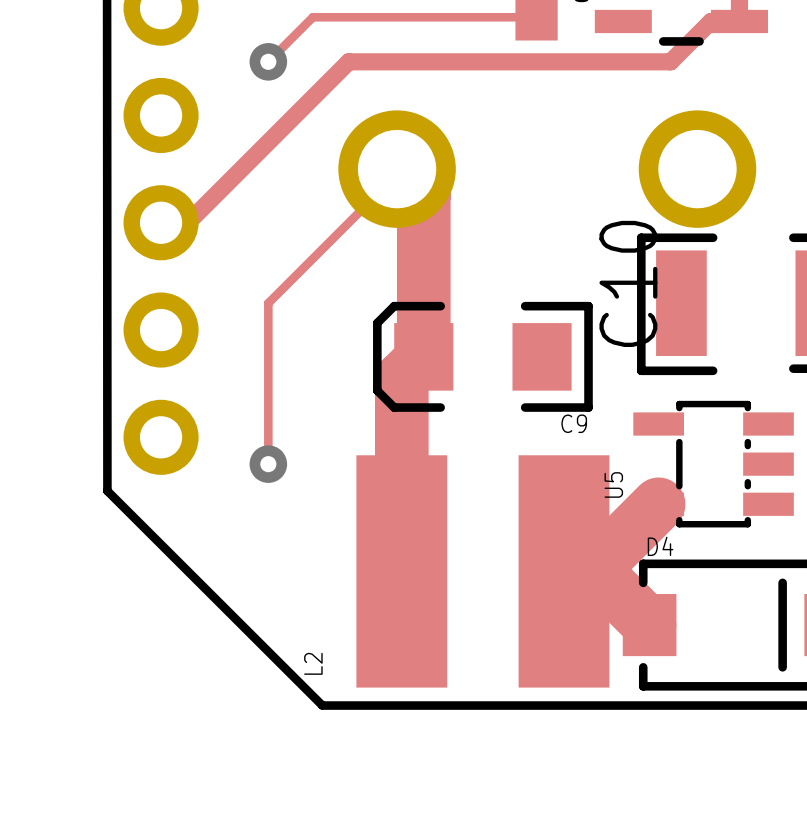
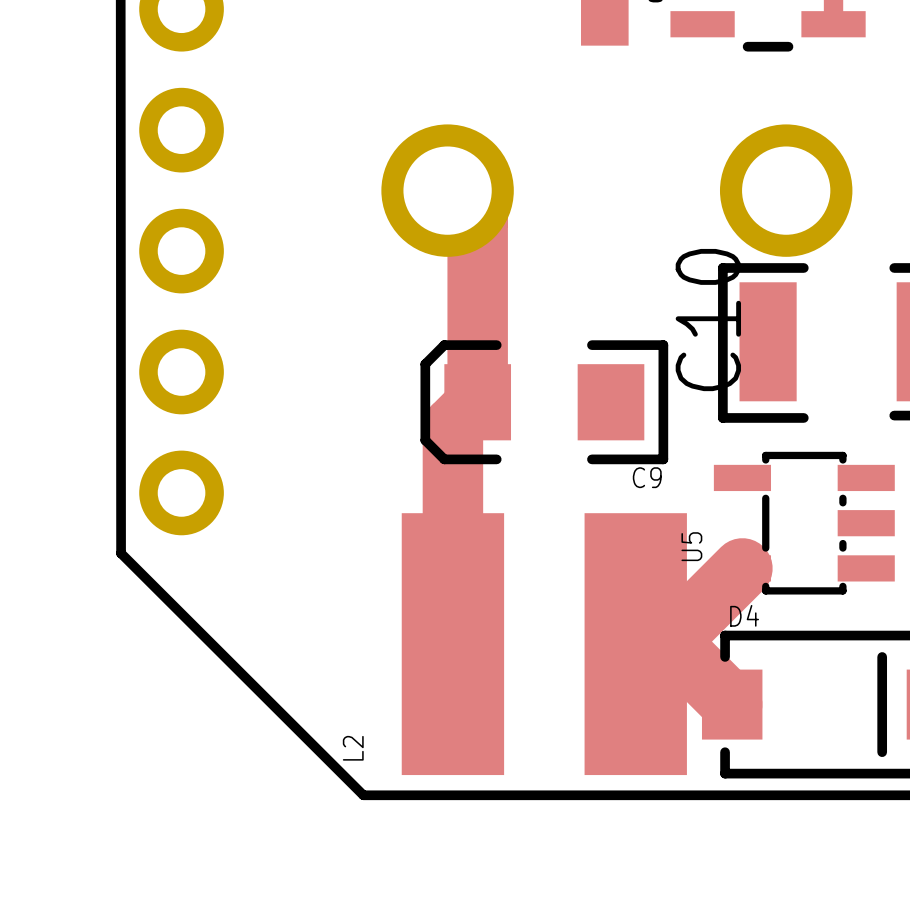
track: (536, 17) (312, 17) (268, 61) -> none
track: (739, 21) (711, 21) (670, 61) (348, 61) (187, 222) (161, 222) -> none
via: (268, 61) -> none
track: (397, 169) (397, 174) (268, 303) (268, 464) -> none
via: (268, 464) -> none

